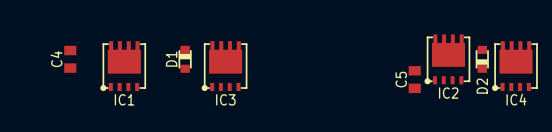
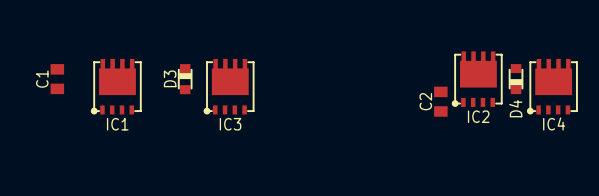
C4 name: C4 (56, 59) -> C1 (42, 79)
D1 name: D1 (171, 59) -> D3 (170, 78)
C5 name: C5 (401, 79) -> C2 (425, 101)
D2 name: D2 (482, 86) -> D4 (515, 108)

